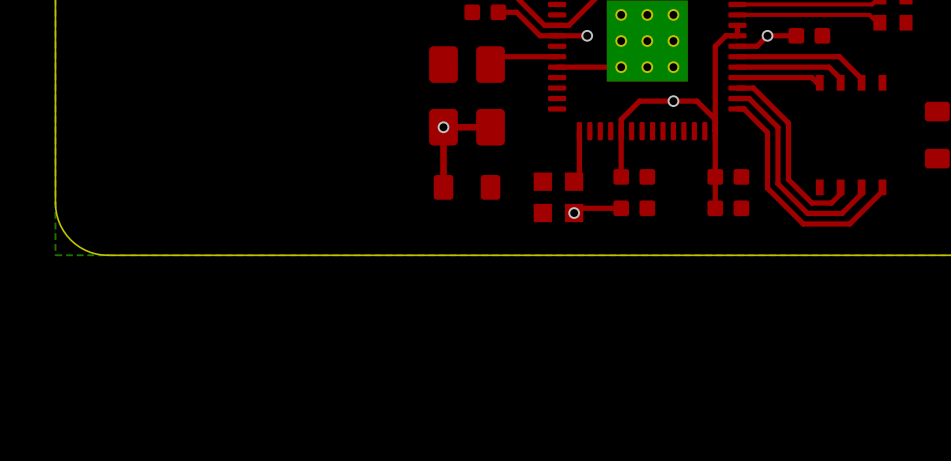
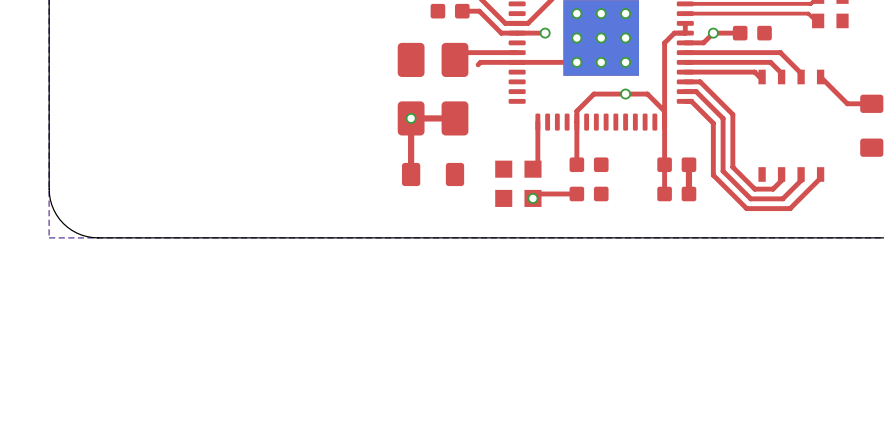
top track: none -> (517, 62) (480, 62) (478, 64)
top track: none -> (820, 76) (847, 103) (871, 103)
top track: none -> (688, 164) (688, 193)

